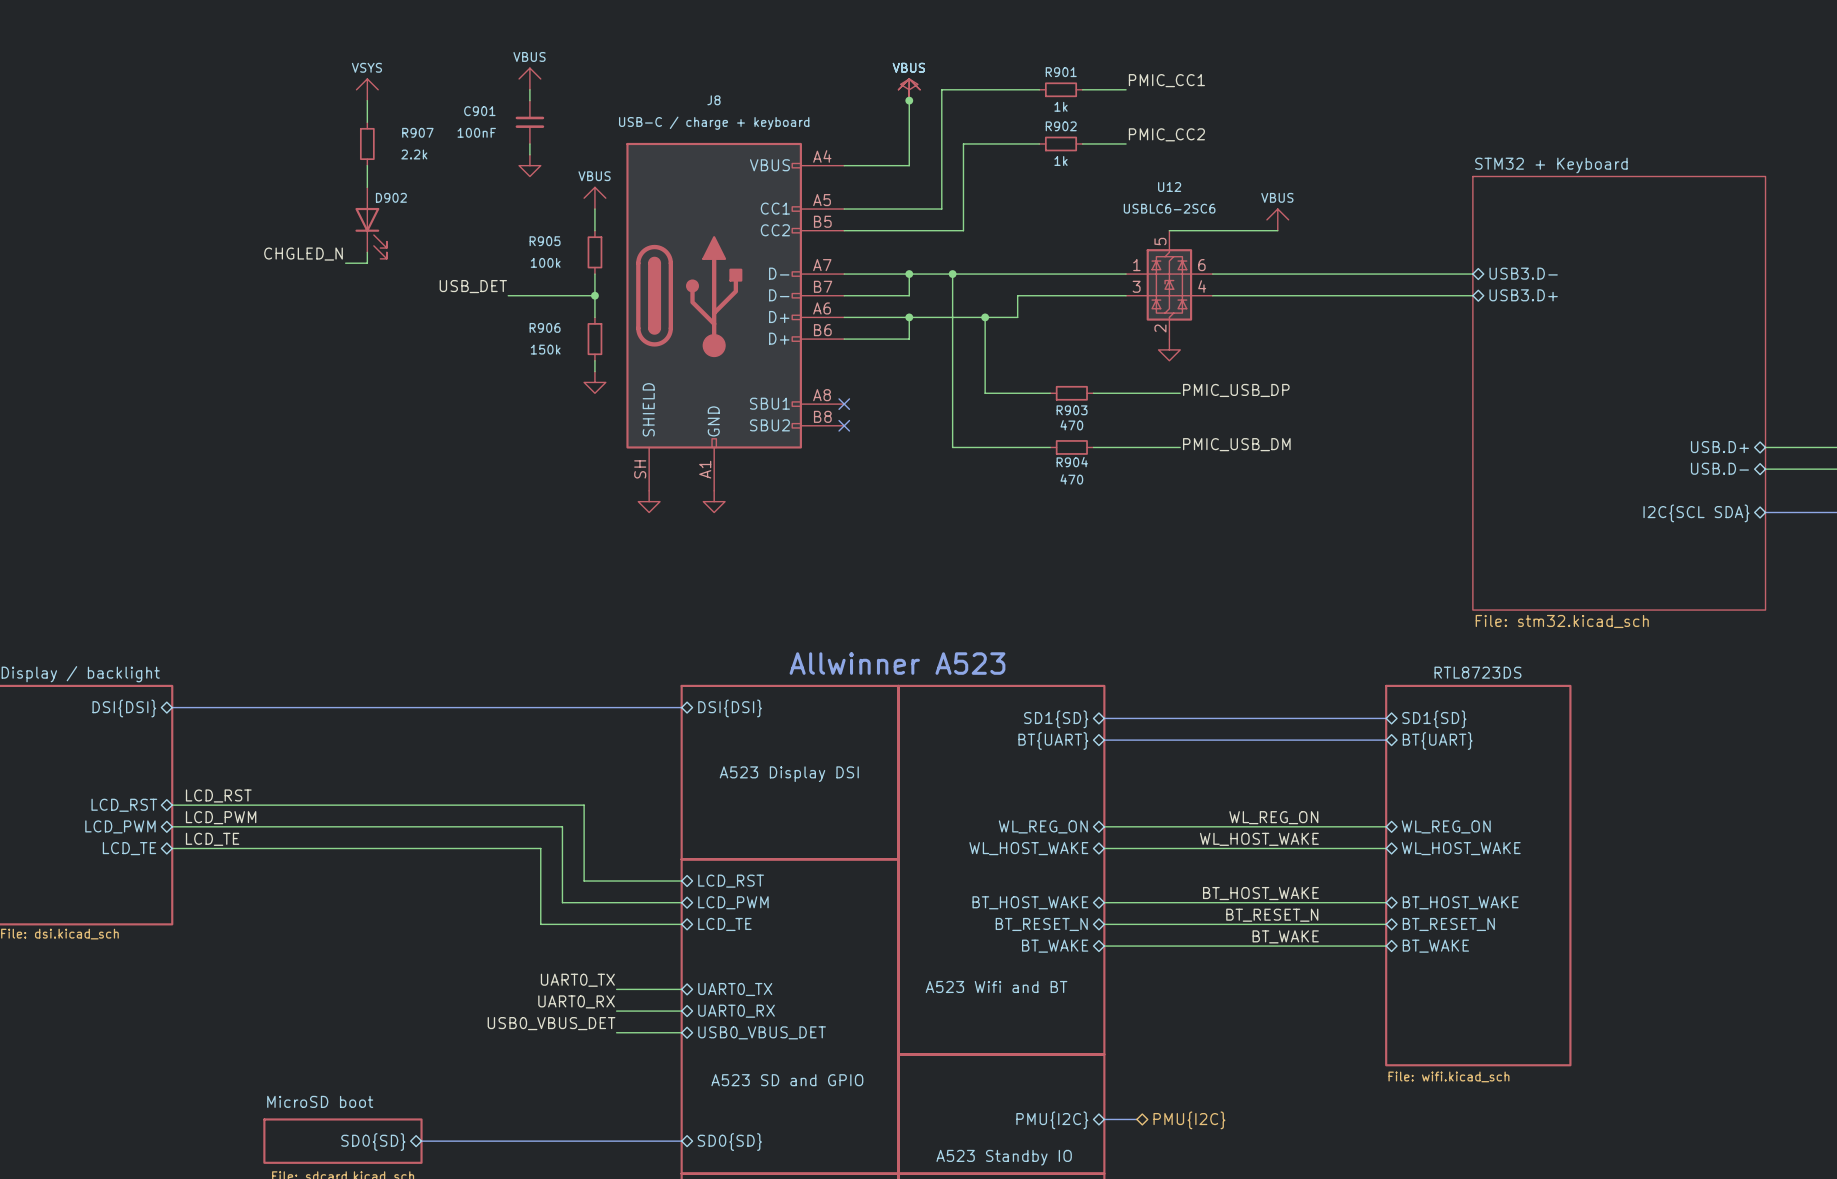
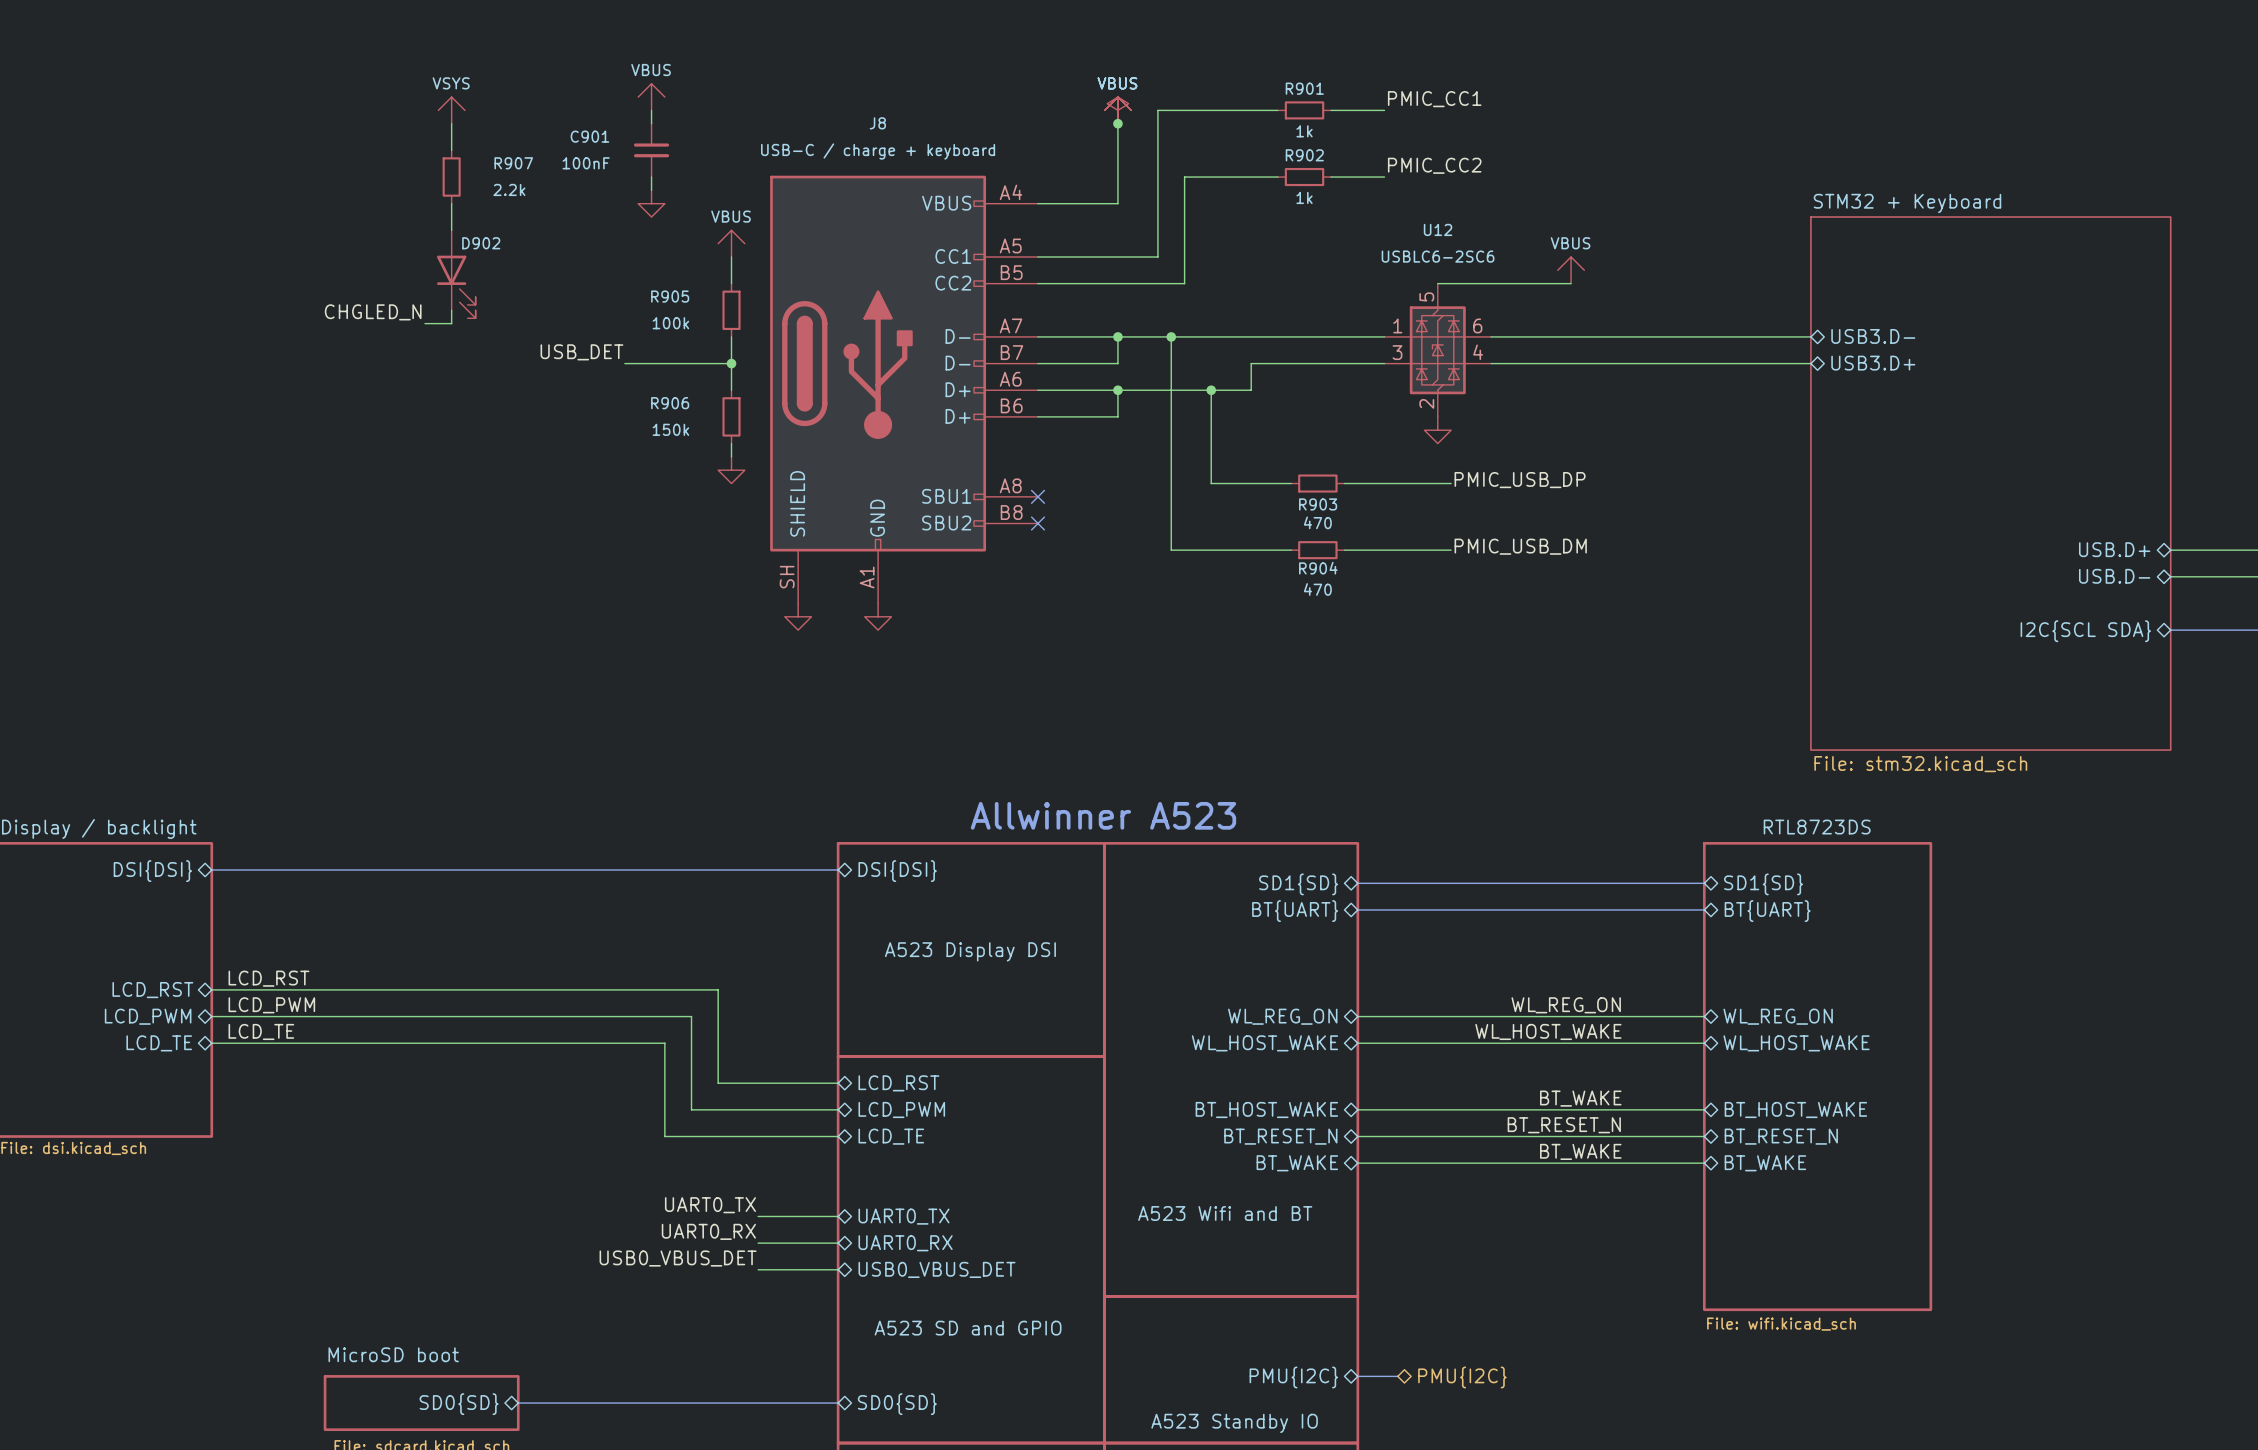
label: BT_HOST_WAKE (1260, 893) -> BT_WAKE (1580, 1098)

